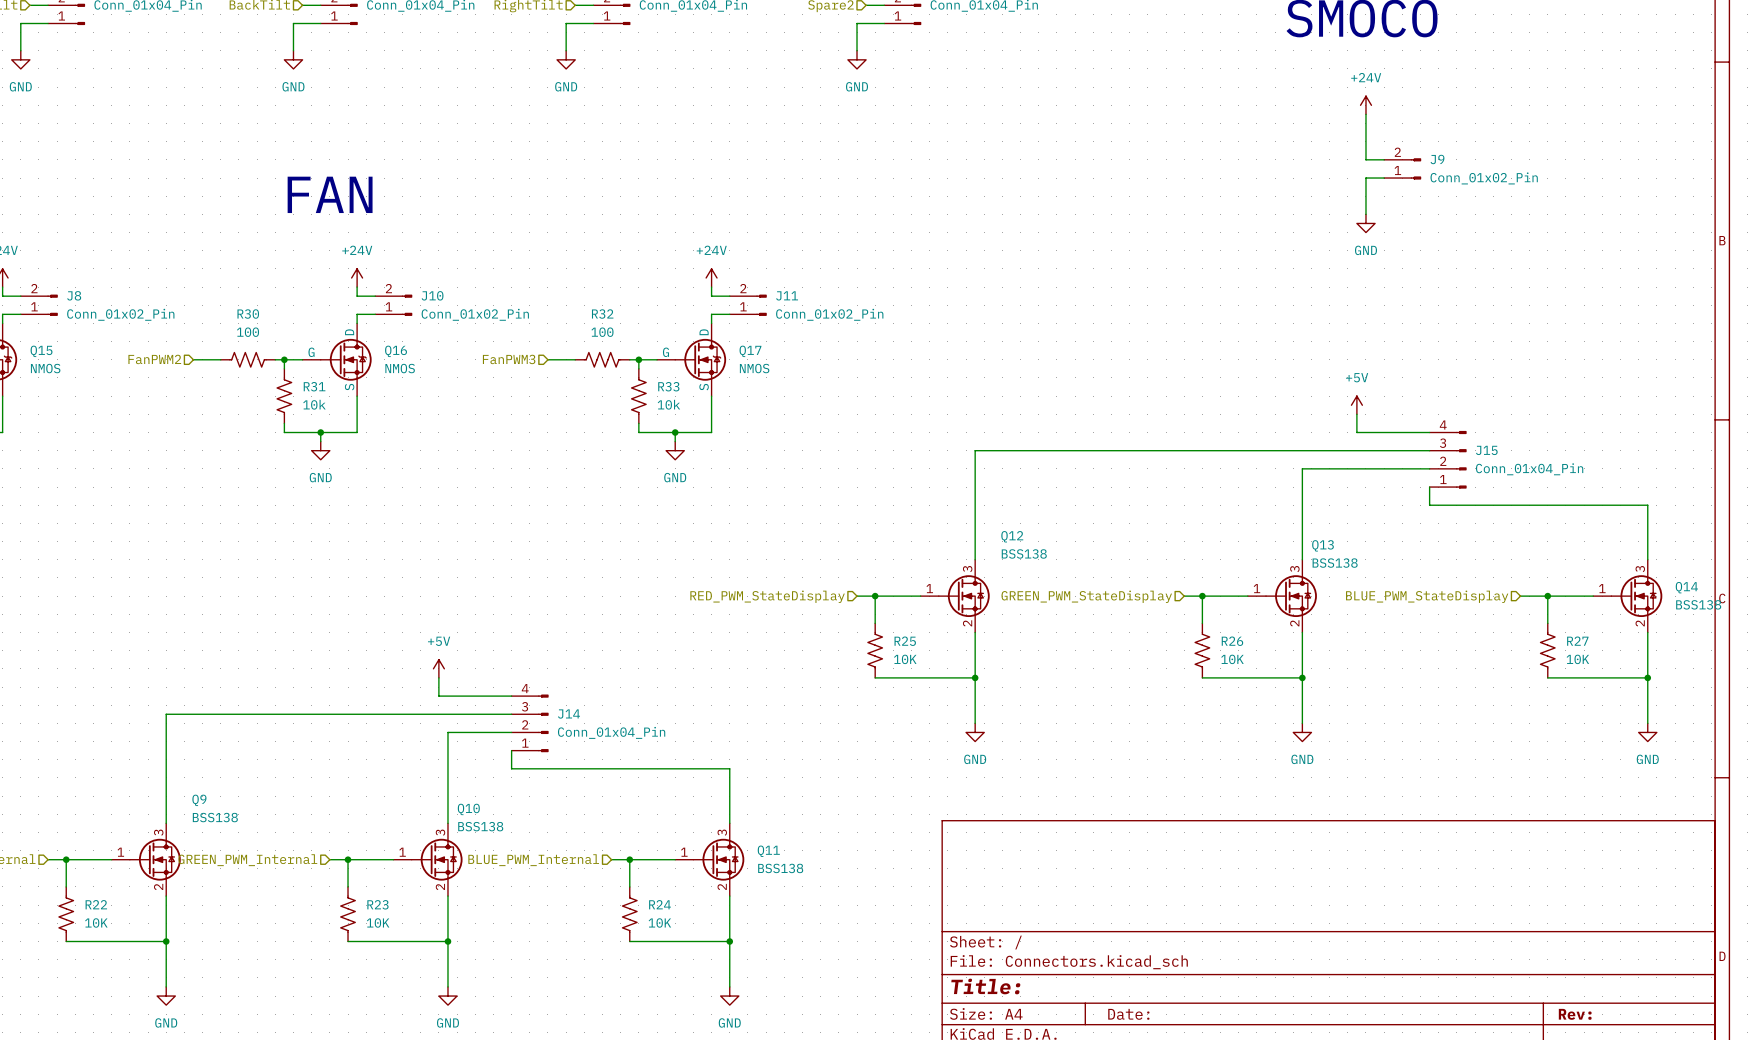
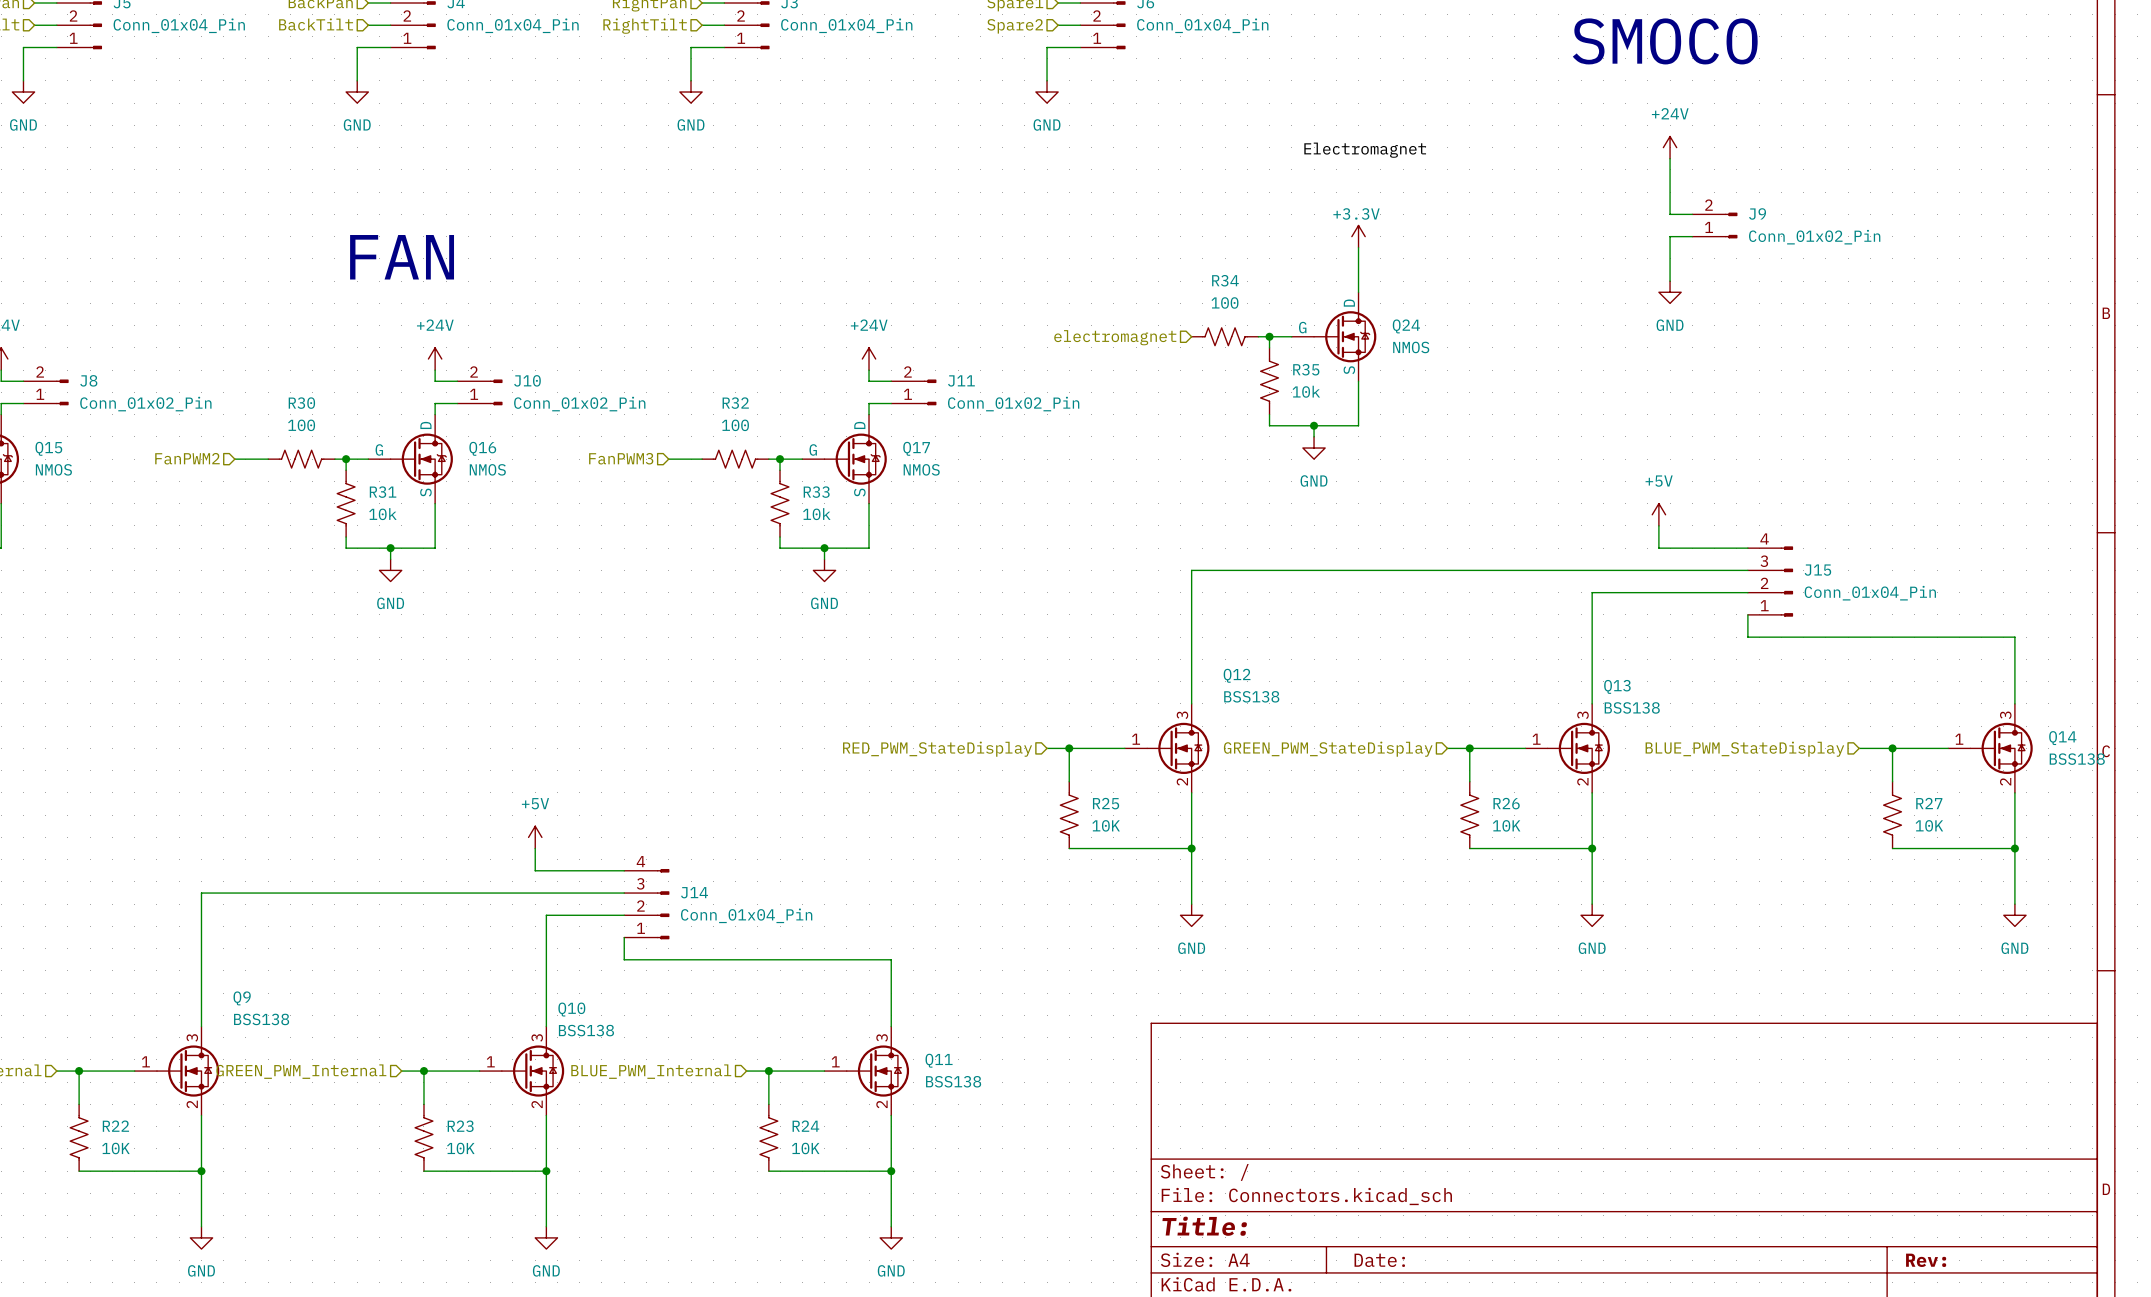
label: none -> Electromagnet (1365, 150)
power symbol: none -> +3.3V (1358, 236)
wire: none -> (1358, 247) (1358, 292)
R34: none -> 100 (1225, 336)
wire: none -> (1258, 336) (1291, 336)
wire: none -> (1269, 336) (1269, 347)
junction: none -> (1269, 336)
Q24: none -> NMOS (1334, 336)
hierarchical label: none -> electromagnet (1115, 337)
R35: none -> 10k (1269, 381)
wire: none -> (1358, 381) (1358, 425) (1269, 425) (1269, 414)
wire: none -> (1314, 425) (1314, 436)
junction: none -> (1314, 425)
power symbol: none -> GND (1314, 448)

